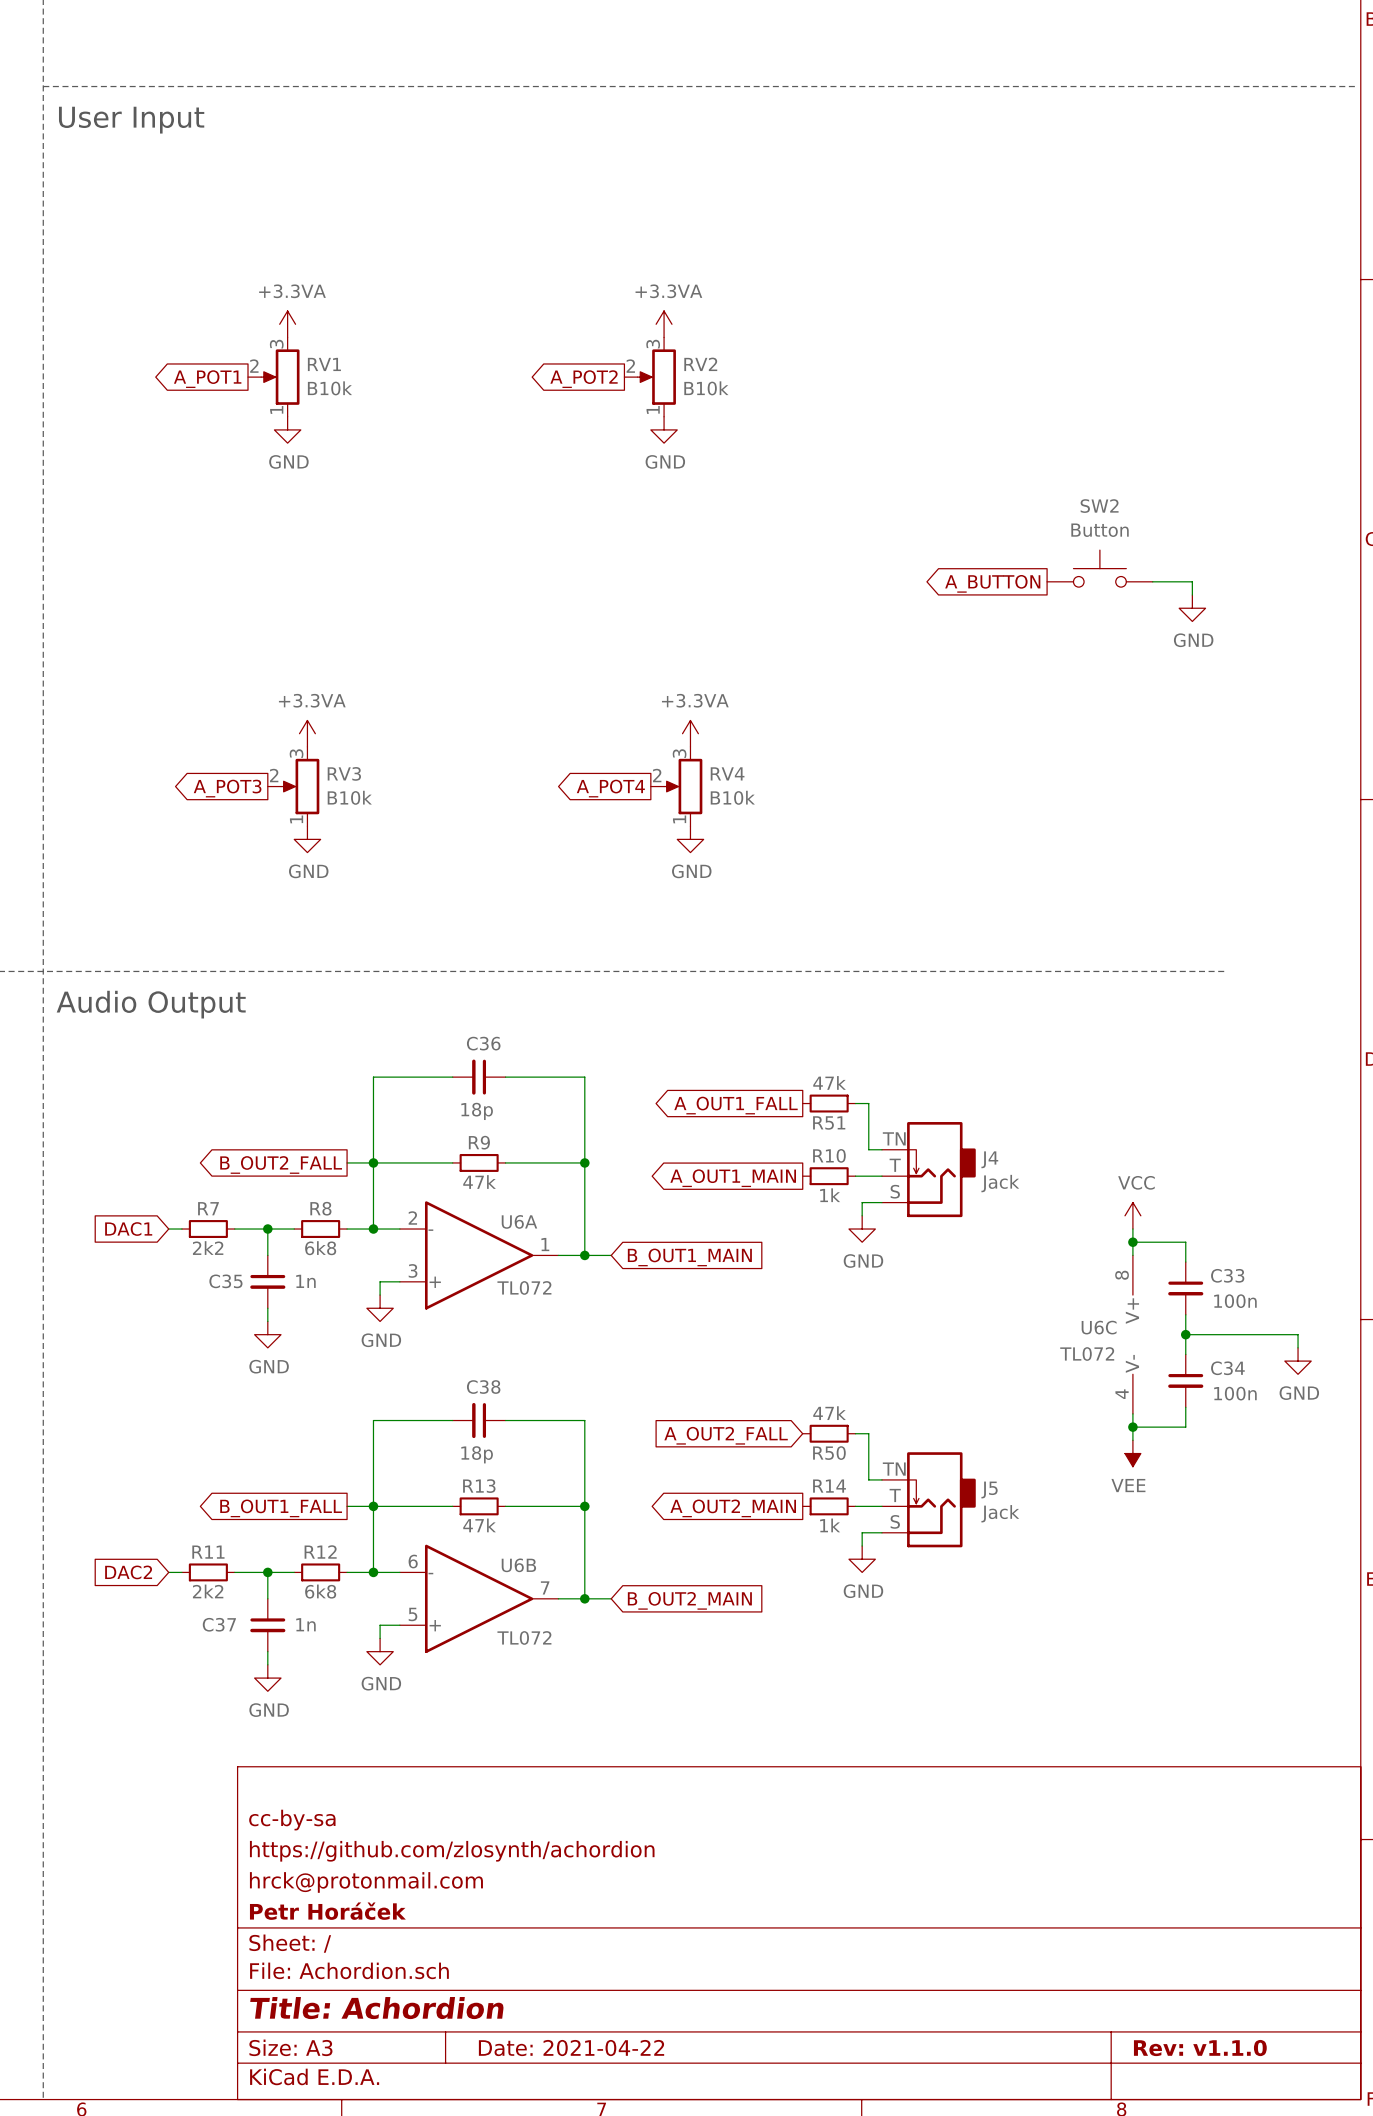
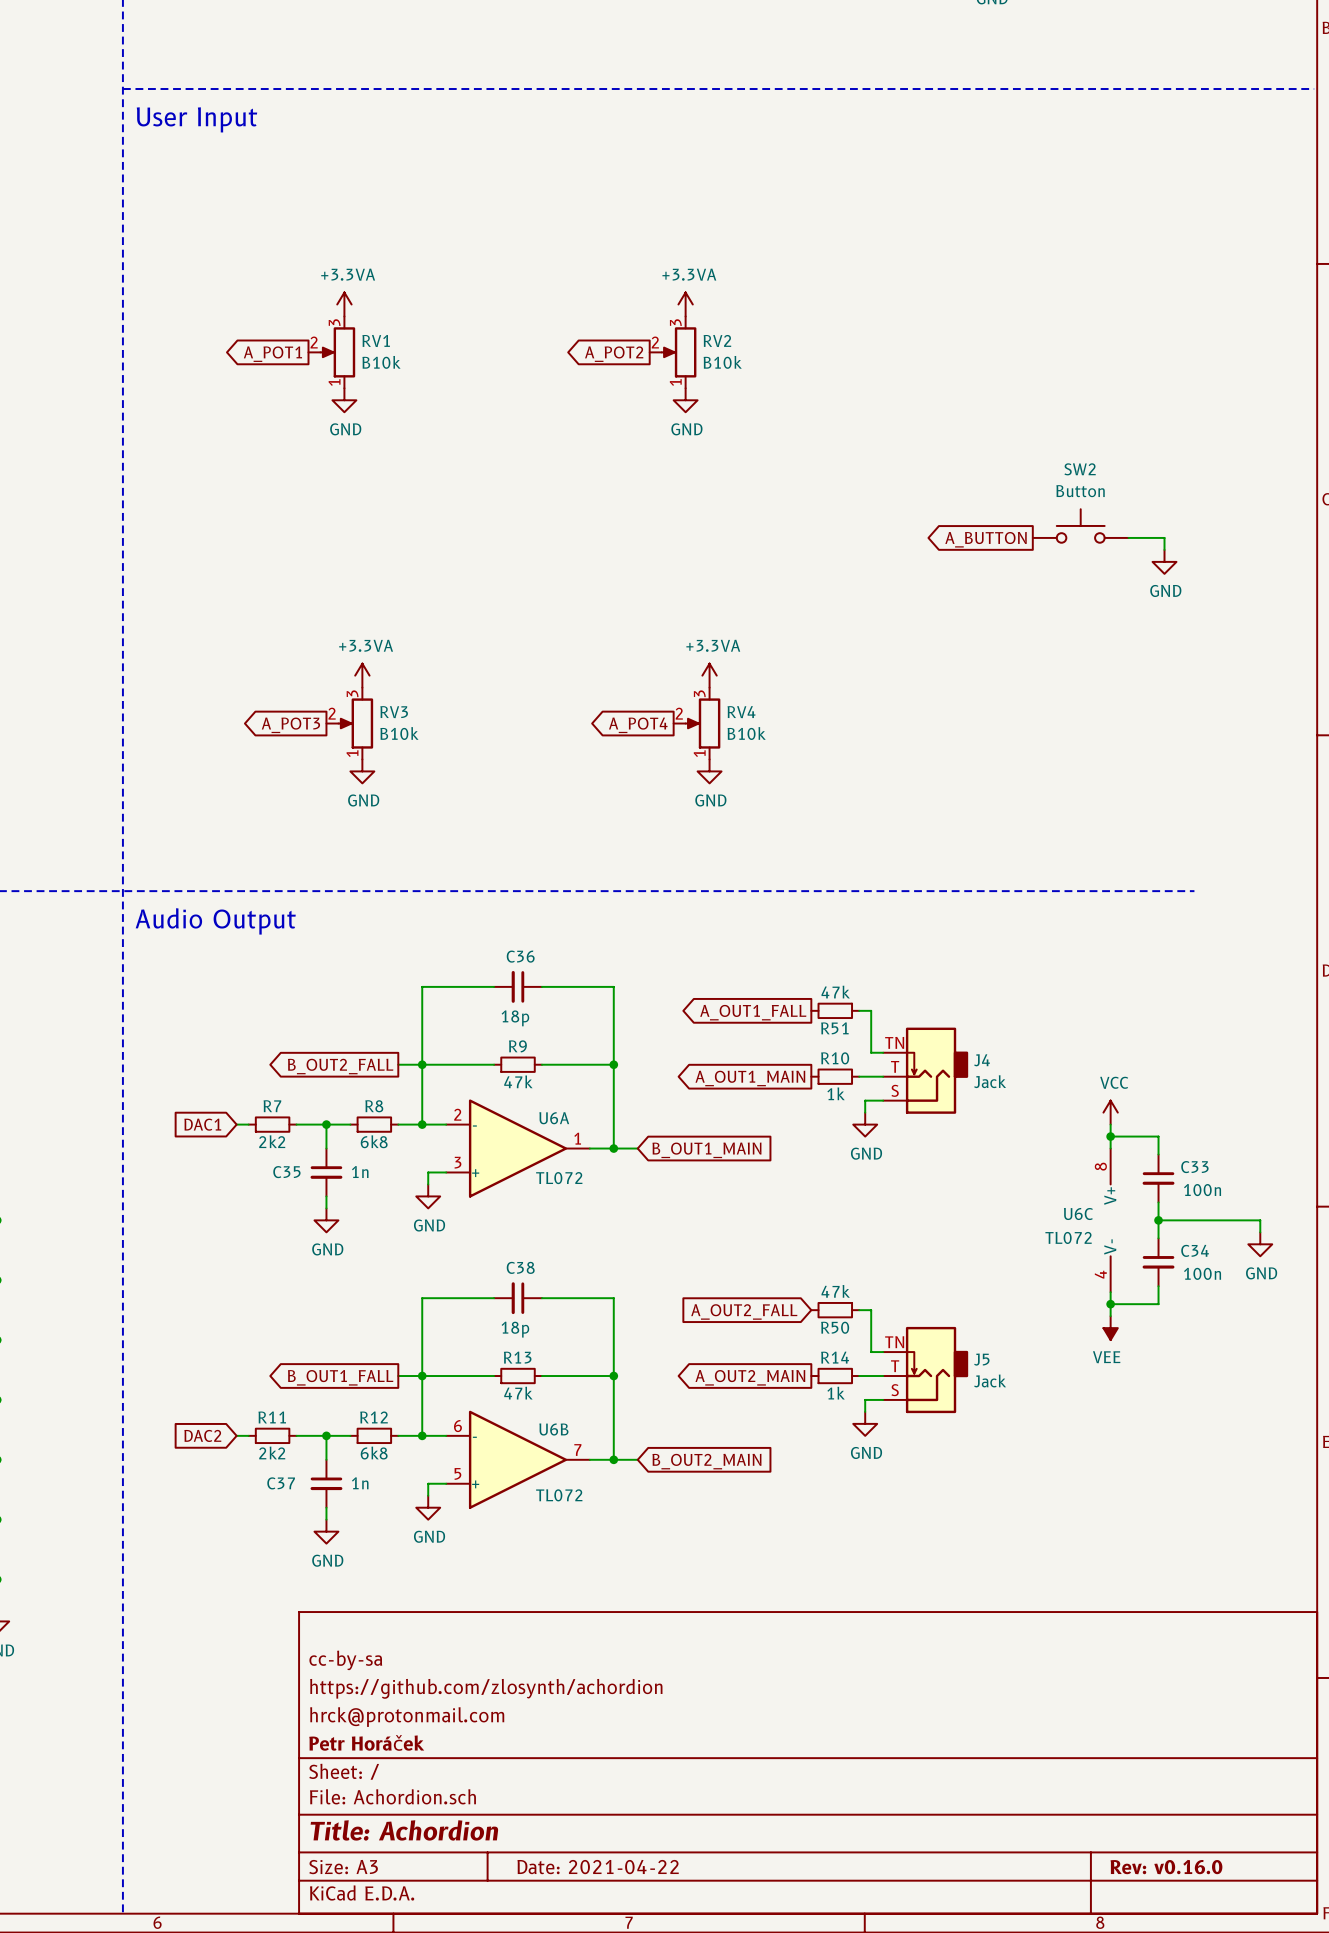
title block: Rev: v1.1.0 (1200, 2048) -> Rev: v0.16.0 (1166, 1867)

